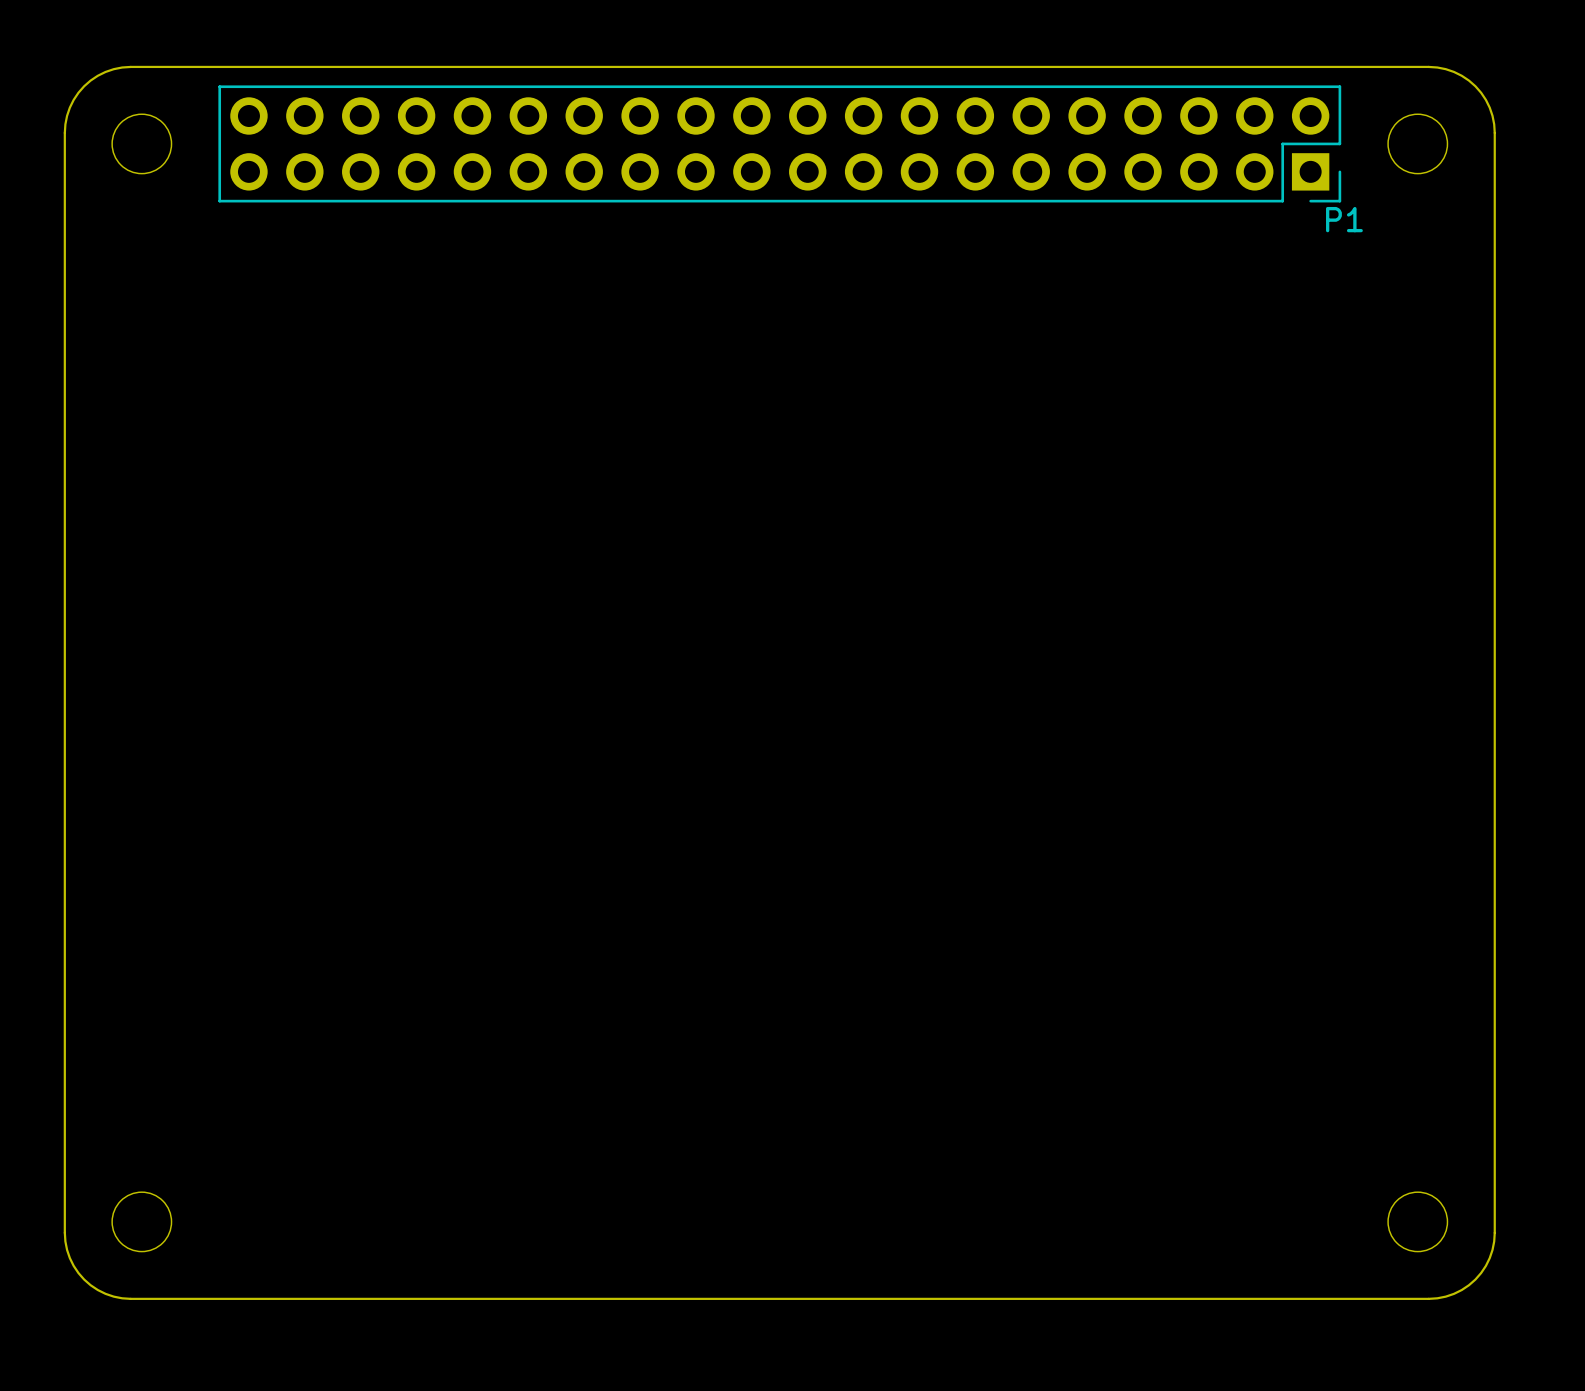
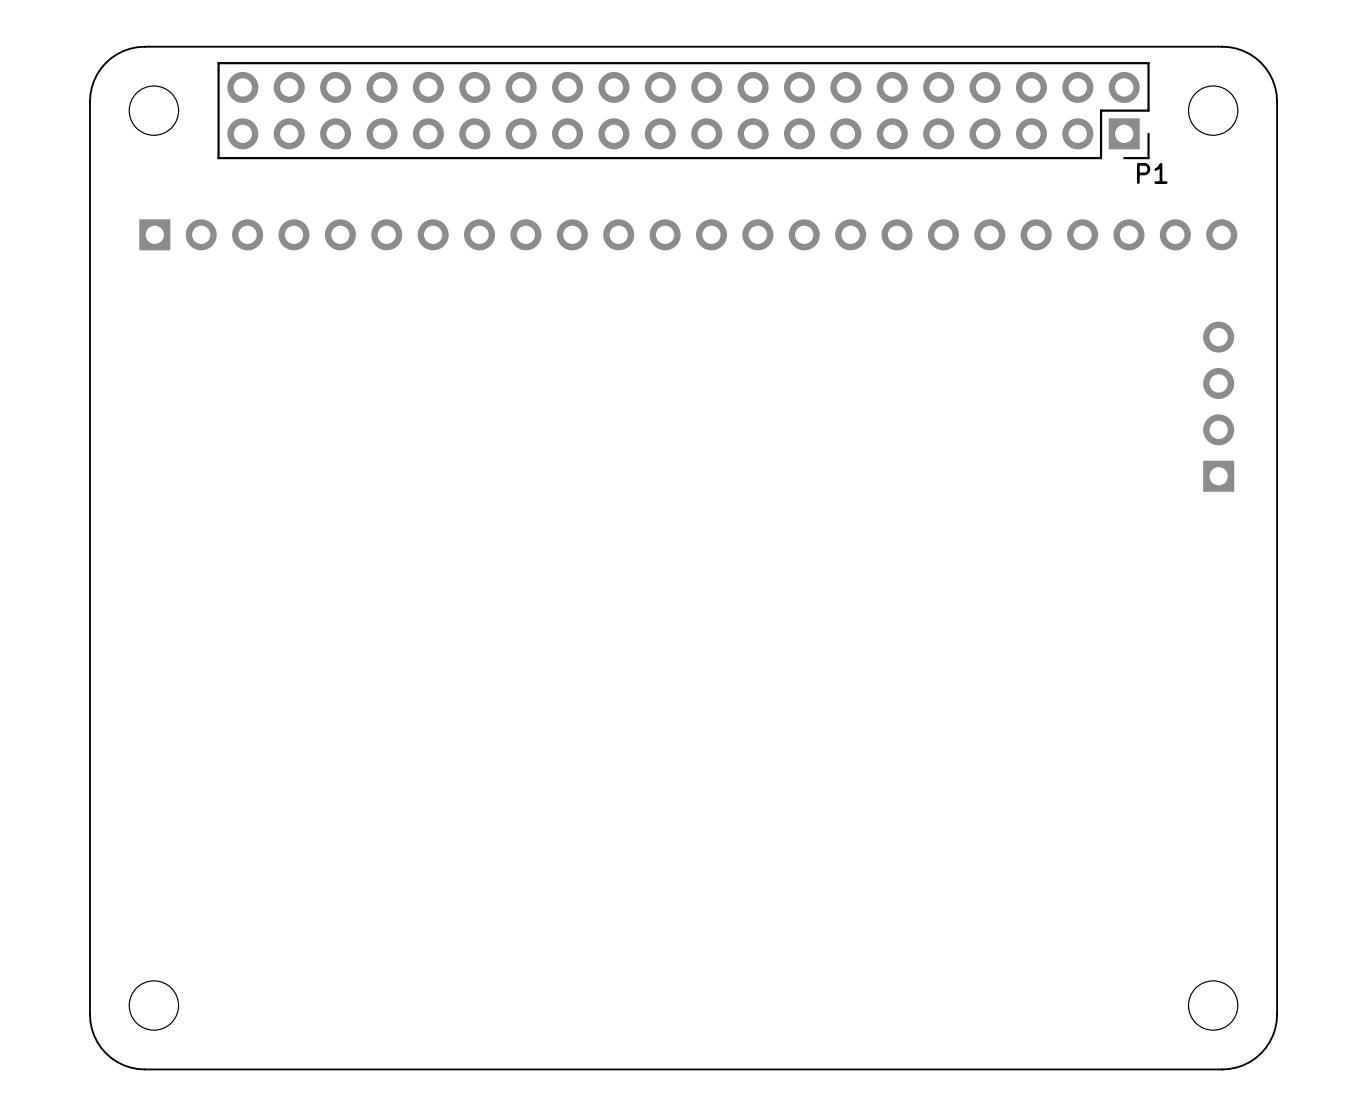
part: none -> (688, 234)
part: none -> (1218, 406)

